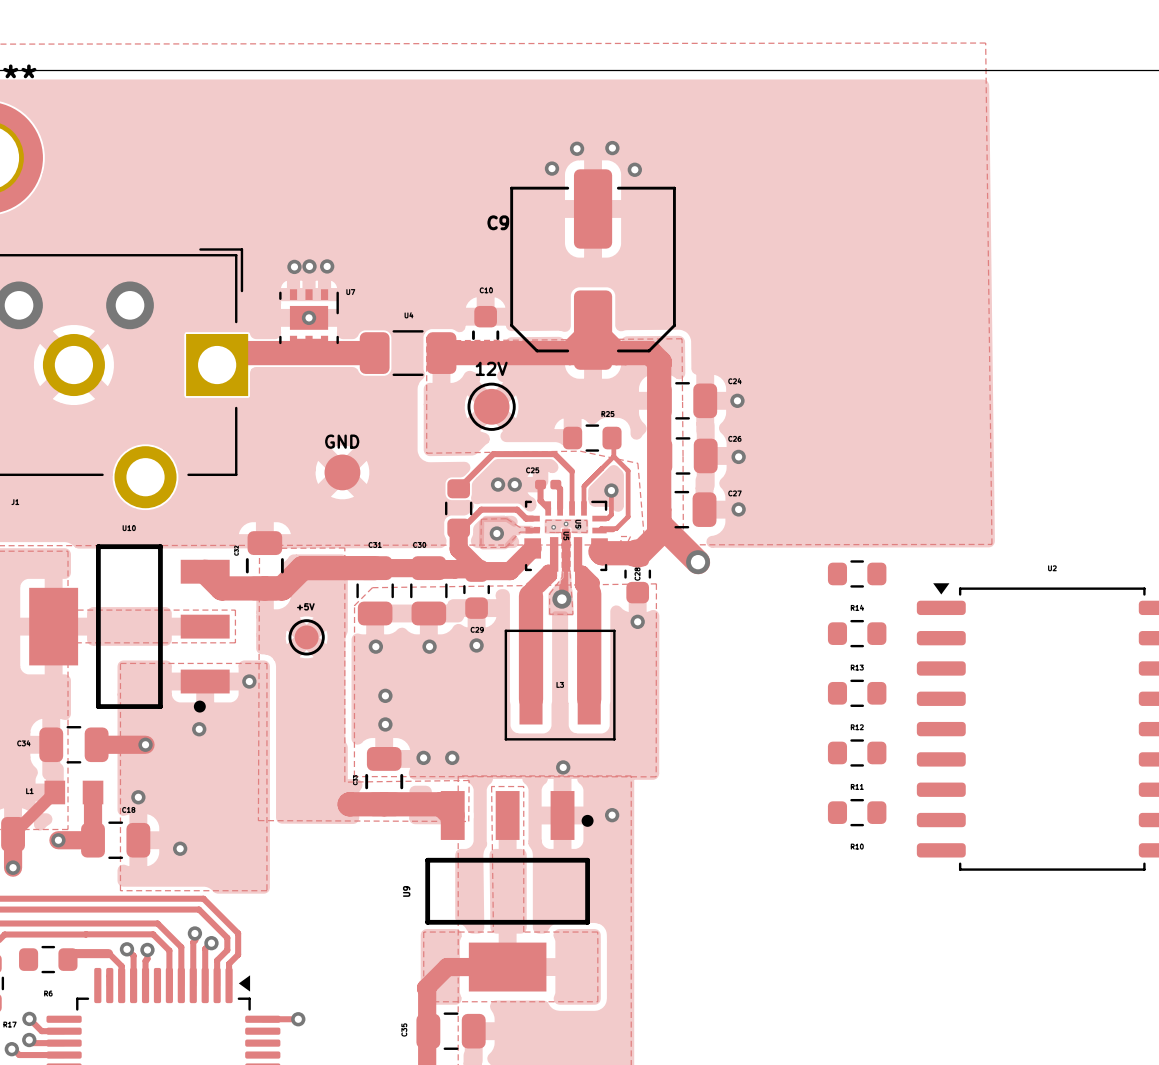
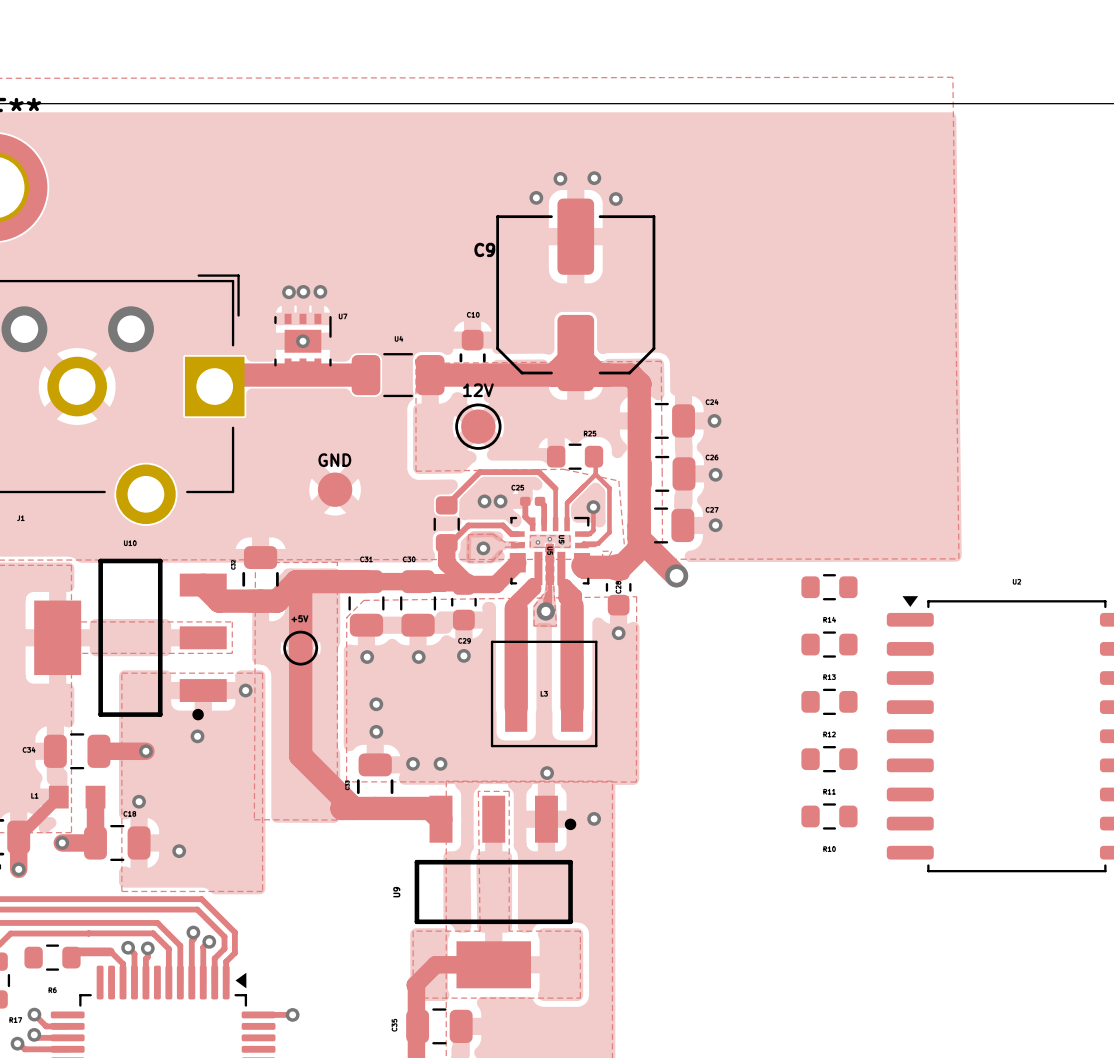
track: none -> (296, 581) (300, 585) (300, 755) (353, 808)
zone outline: (344, 782) (469, 780) (468, 821) (258, 820) (258, 816) -> (337, 787) (336, 820) (254, 819)

